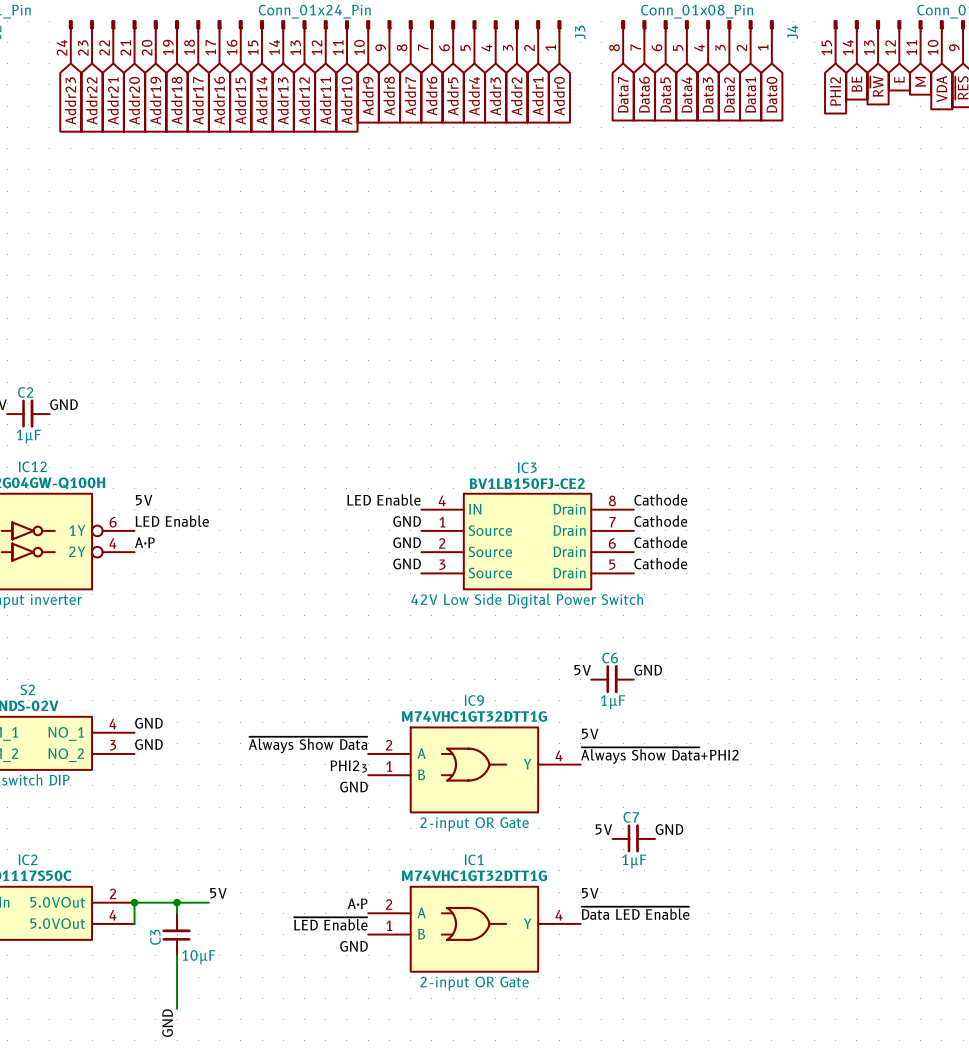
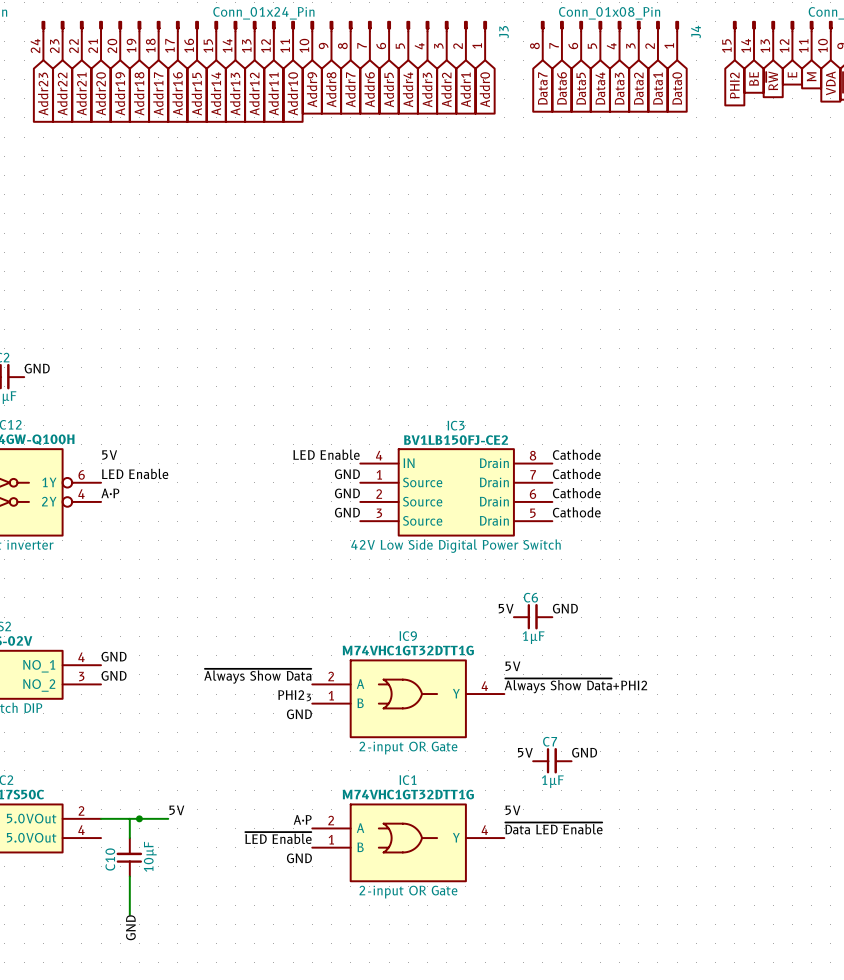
wire: (134, 902) (134, 923) -> (129, 818) (129, 838)
junction: (134, 902) -> none
wire: (177, 902) (177, 913) -> none
C3: 10µF (176, 934) -> none
C10: none -> 10µF (129, 857)
wire: (177, 955) (177, 1008) -> none
wire: none -> (129, 876) (129, 914)

